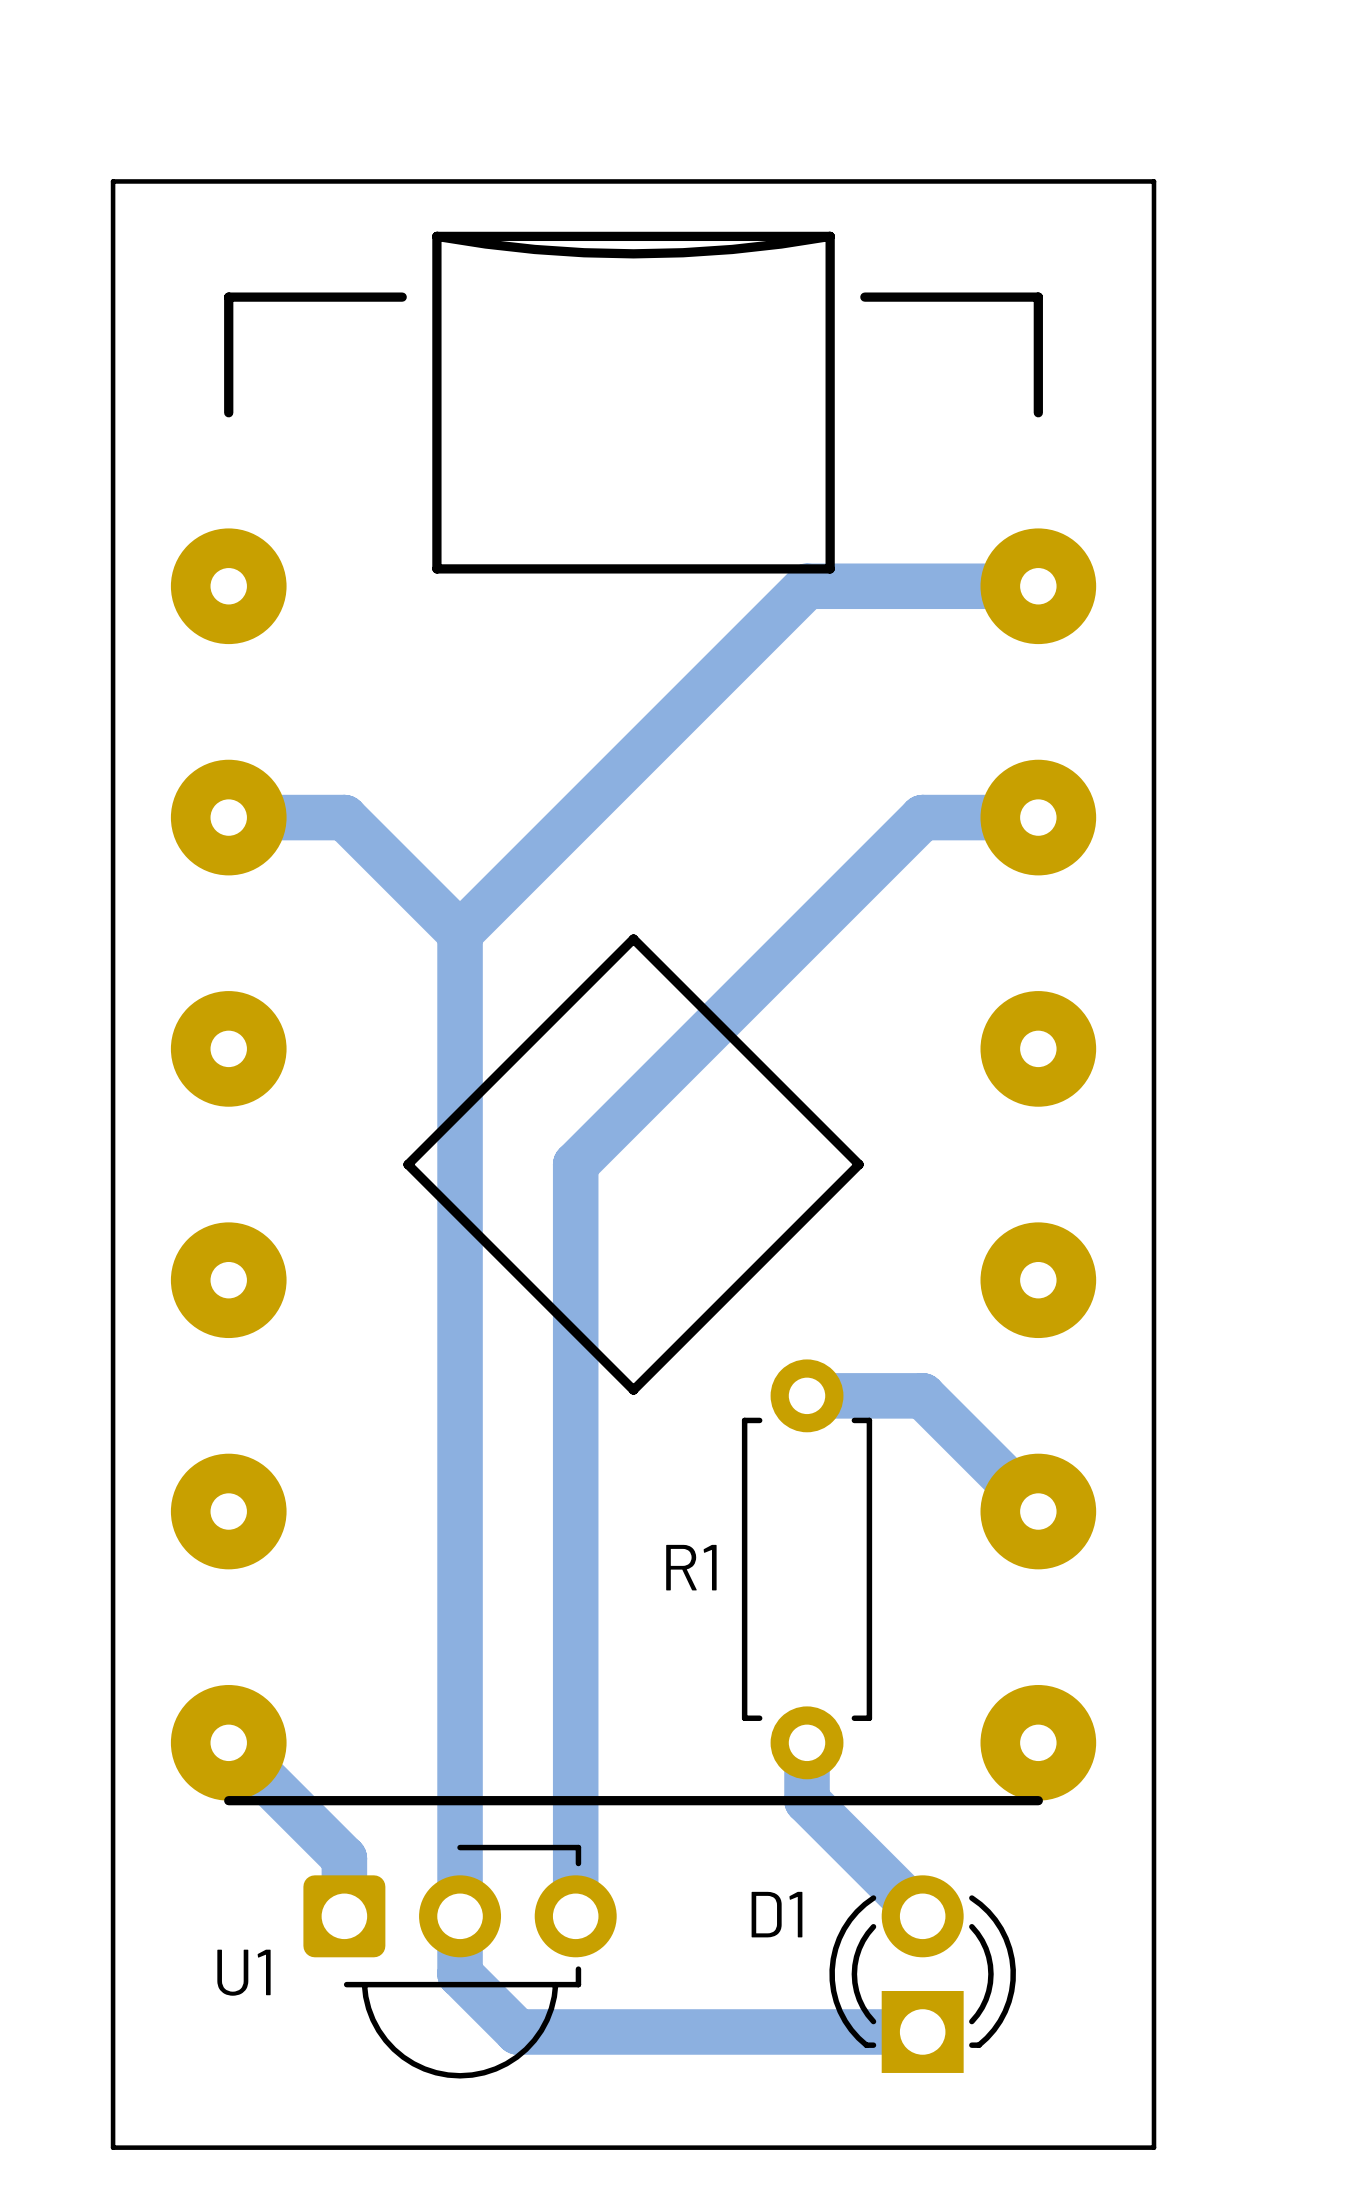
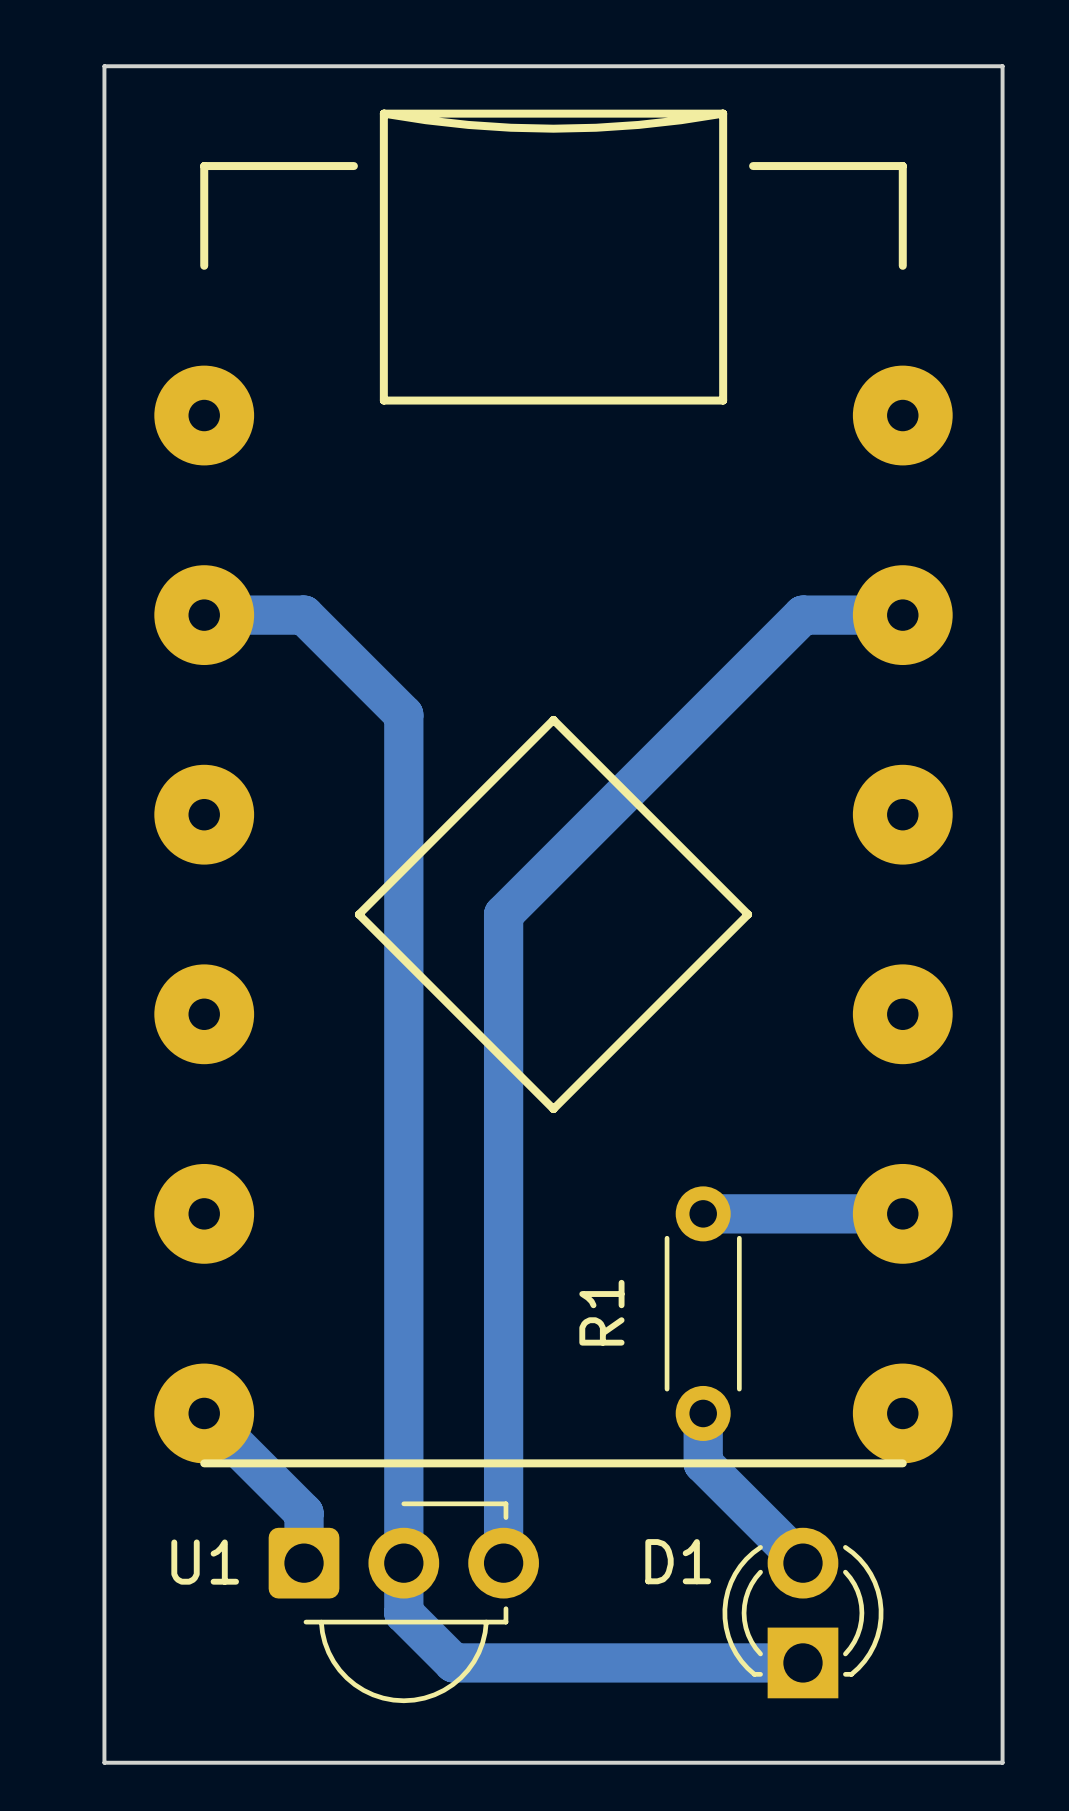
bottom track: (1038, 586) (807, 586) (460, 933) -> none
R1 footprint: [741, 1359, 873, 1780] -> [664, 1186, 742, 1441]
bottom track: (807, 1395) (922, 1395) (1038, 1511) -> (703, 1213) (902, 1213)
U1 name position: U1 (243, 1972) -> U1 (205, 1562)

